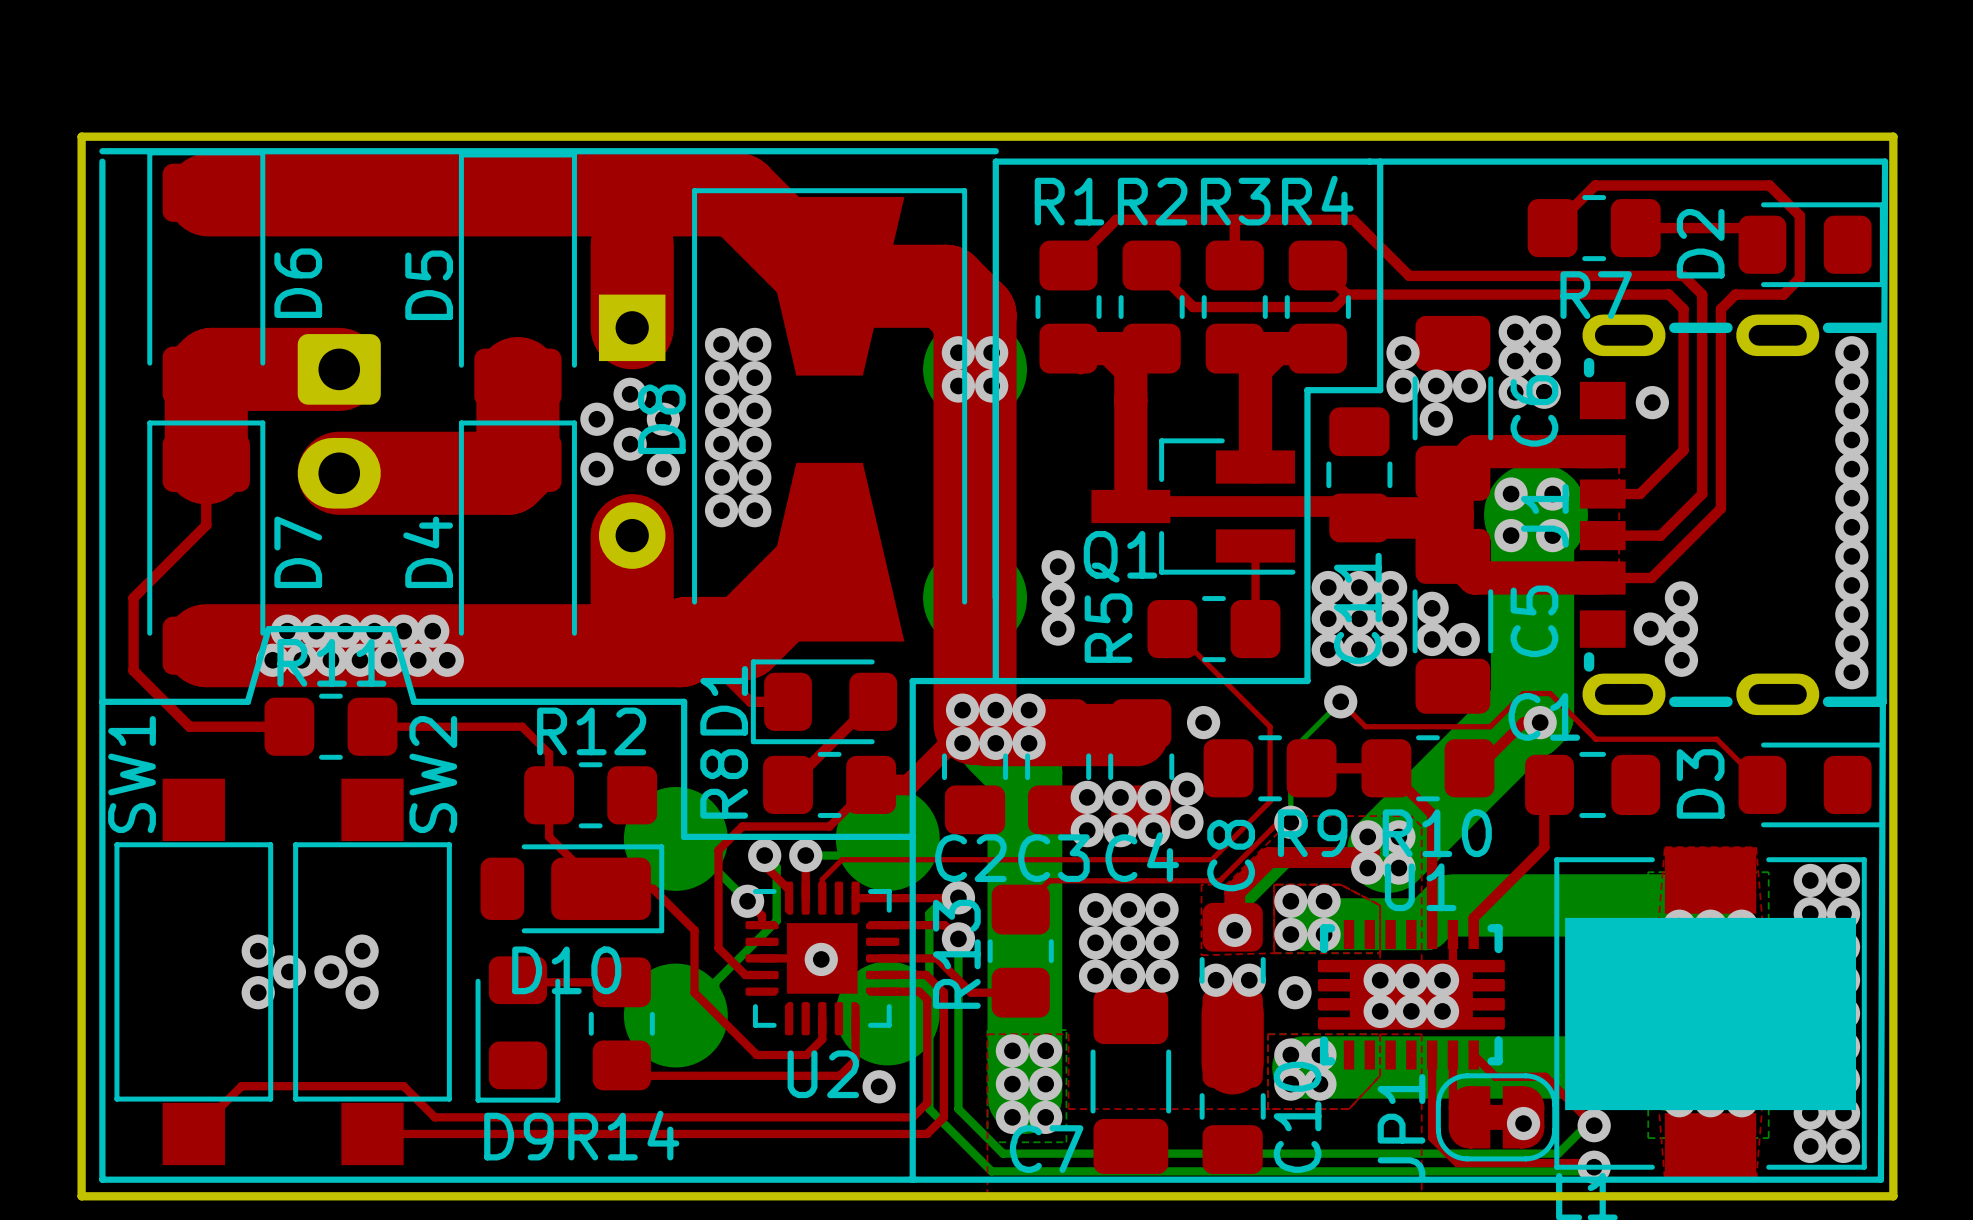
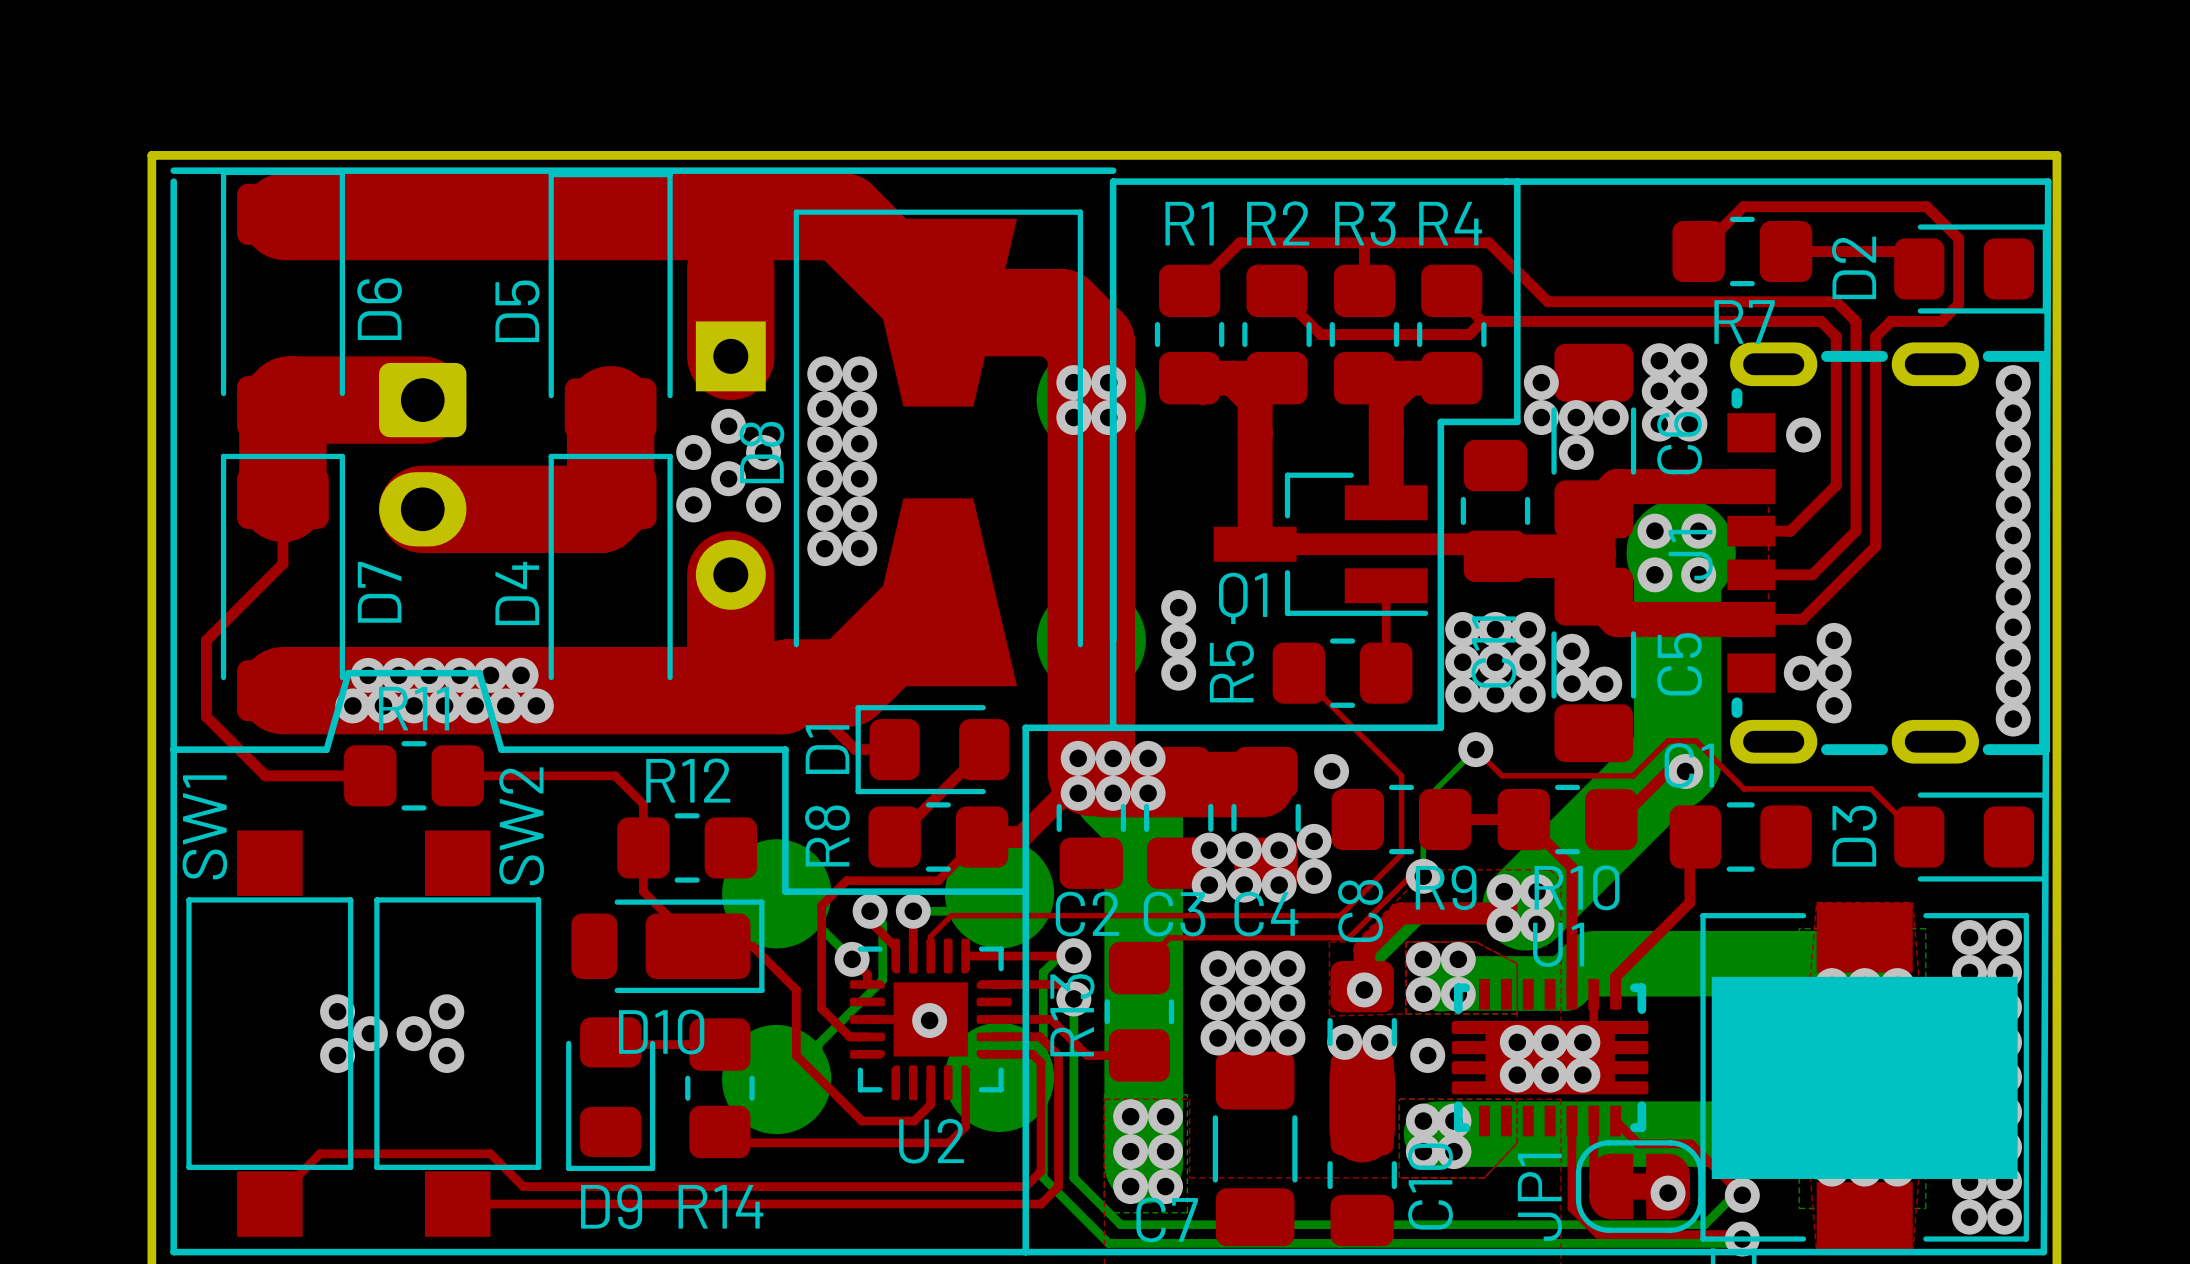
via: (879, 1086) -> none

